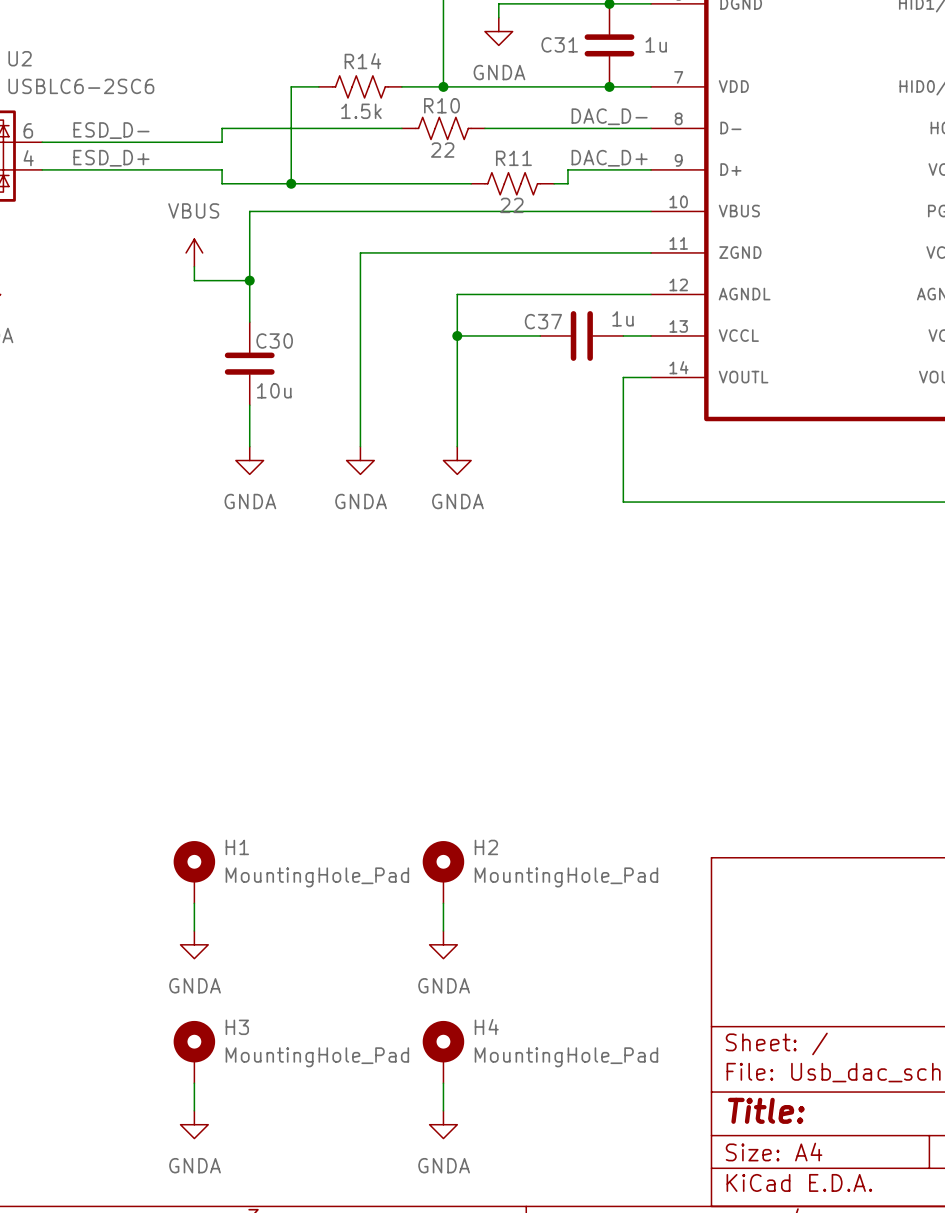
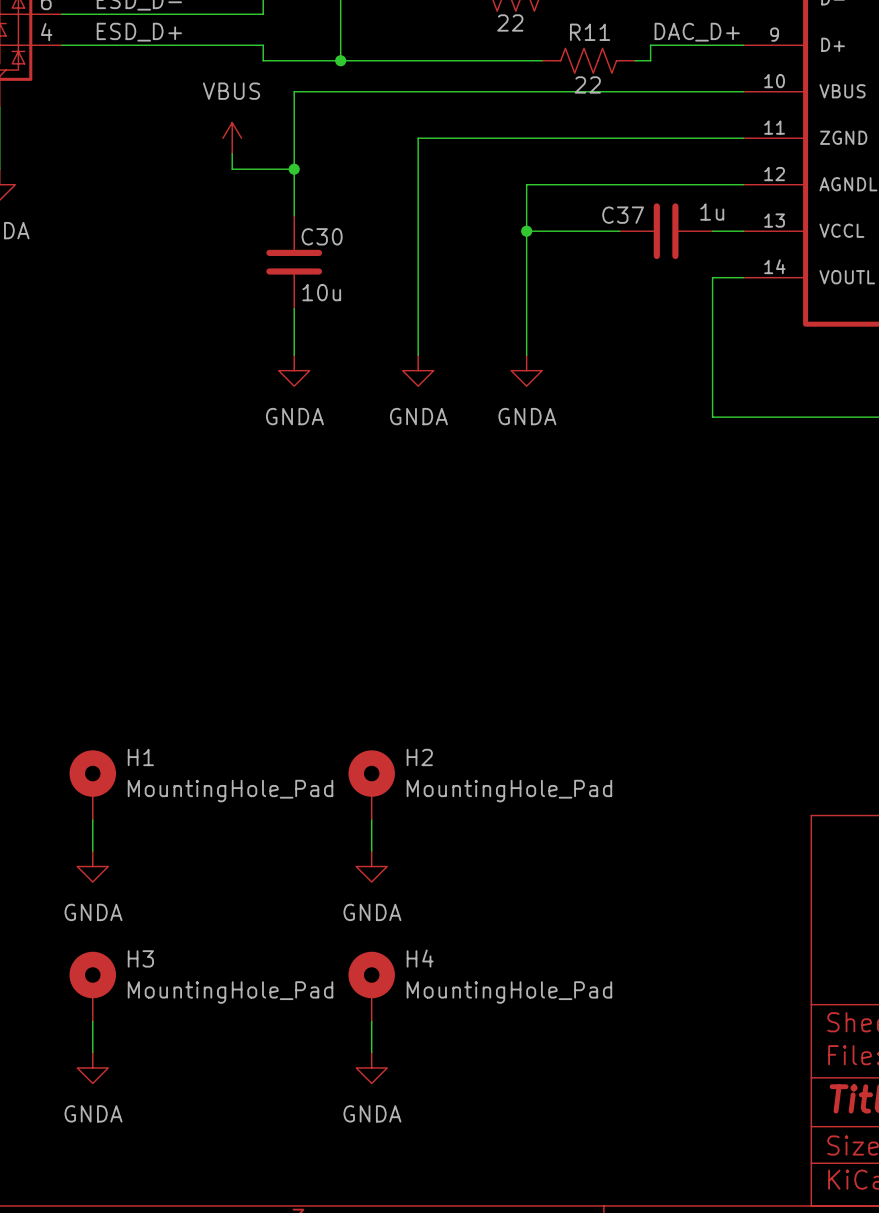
H1 position: (194, 872) -> (92, 785)
H2 position: (443, 872) -> (371, 785)
power symbol: none -> GNDA (92, 866)
wire: (194, 903) (194, 930) -> (92, 820) (92, 851)
power symbol: none -> GNDA (371, 866)
wire: (443, 903) (443, 930) -> (371, 820) (371, 851)
power symbol: GNDA (194, 944) -> none
power symbol: GNDA (443, 944) -> none
H3 position: (194, 1052) -> (92, 986)
H4 position: (443, 1052) -> (371, 986)
power symbol: none -> GNDA (92, 1067)
wire: (194, 1083) (194, 1110) -> (92, 1021) (92, 1052)
power symbol: none -> GNDA (371, 1067)
wire: (443, 1083) (443, 1110) -> (371, 1021) (371, 1052)
power symbol: GNDA (194, 1124) -> none
power symbol: GNDA (443, 1124) -> none

